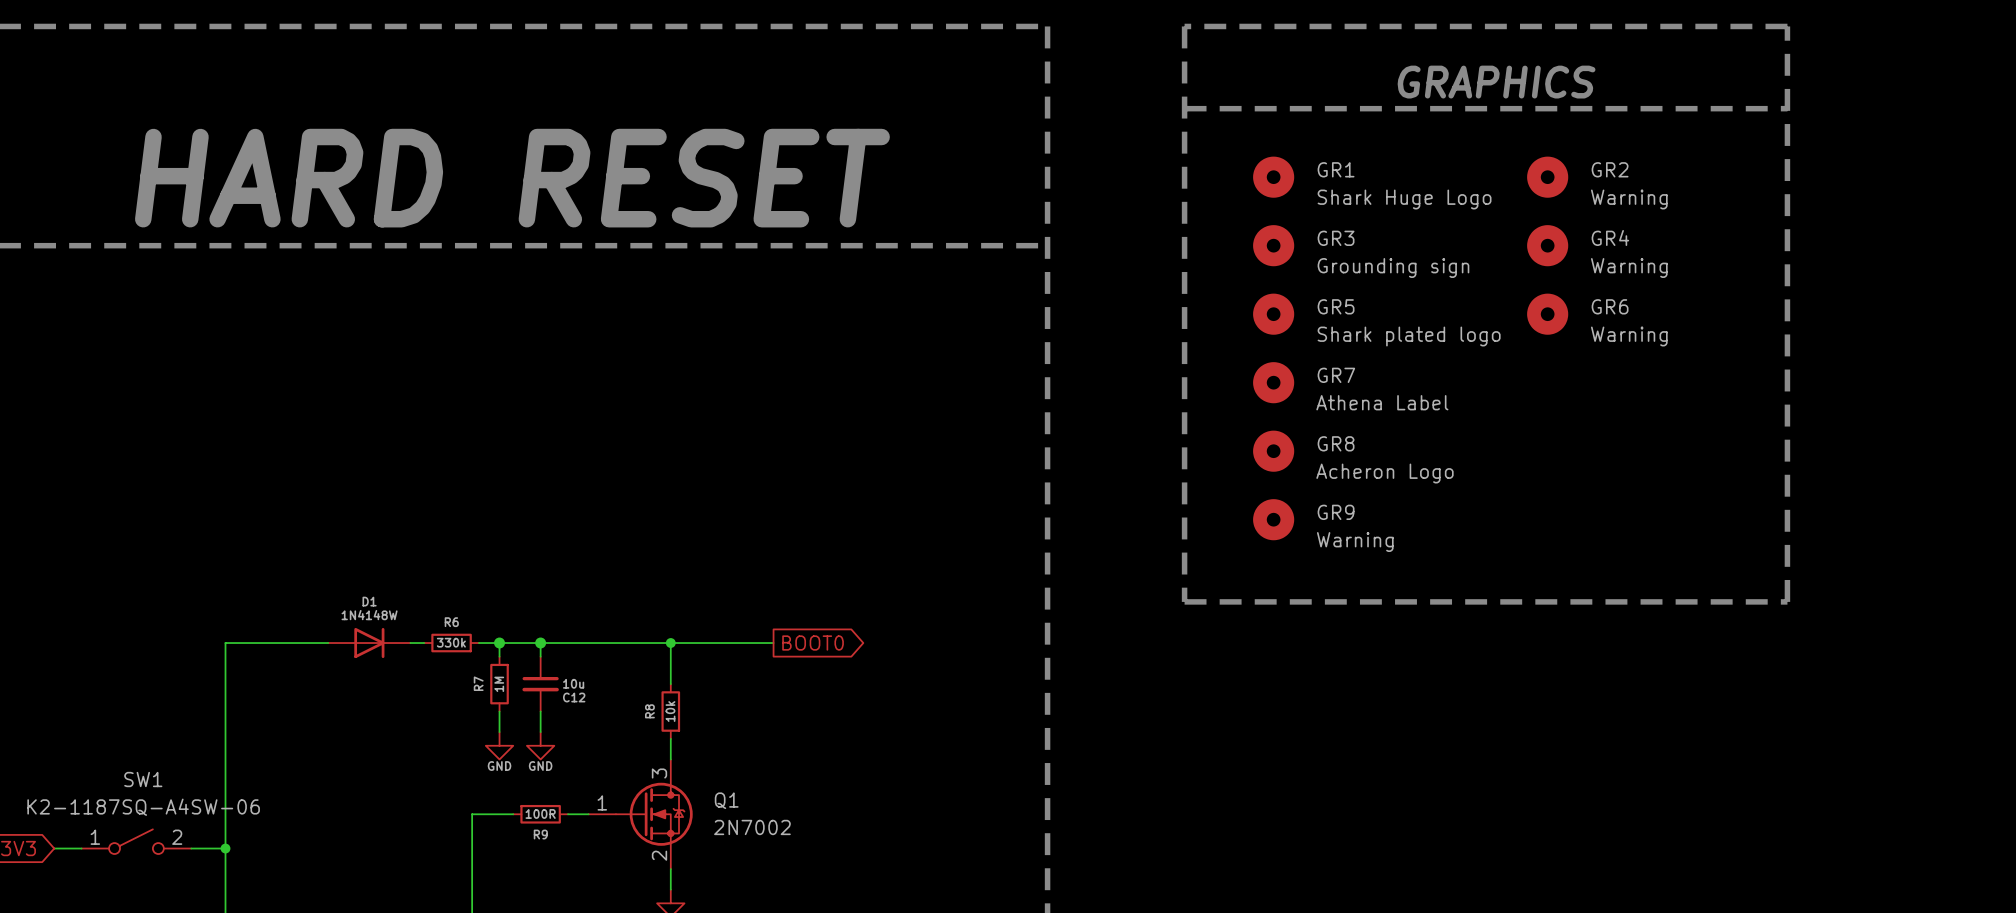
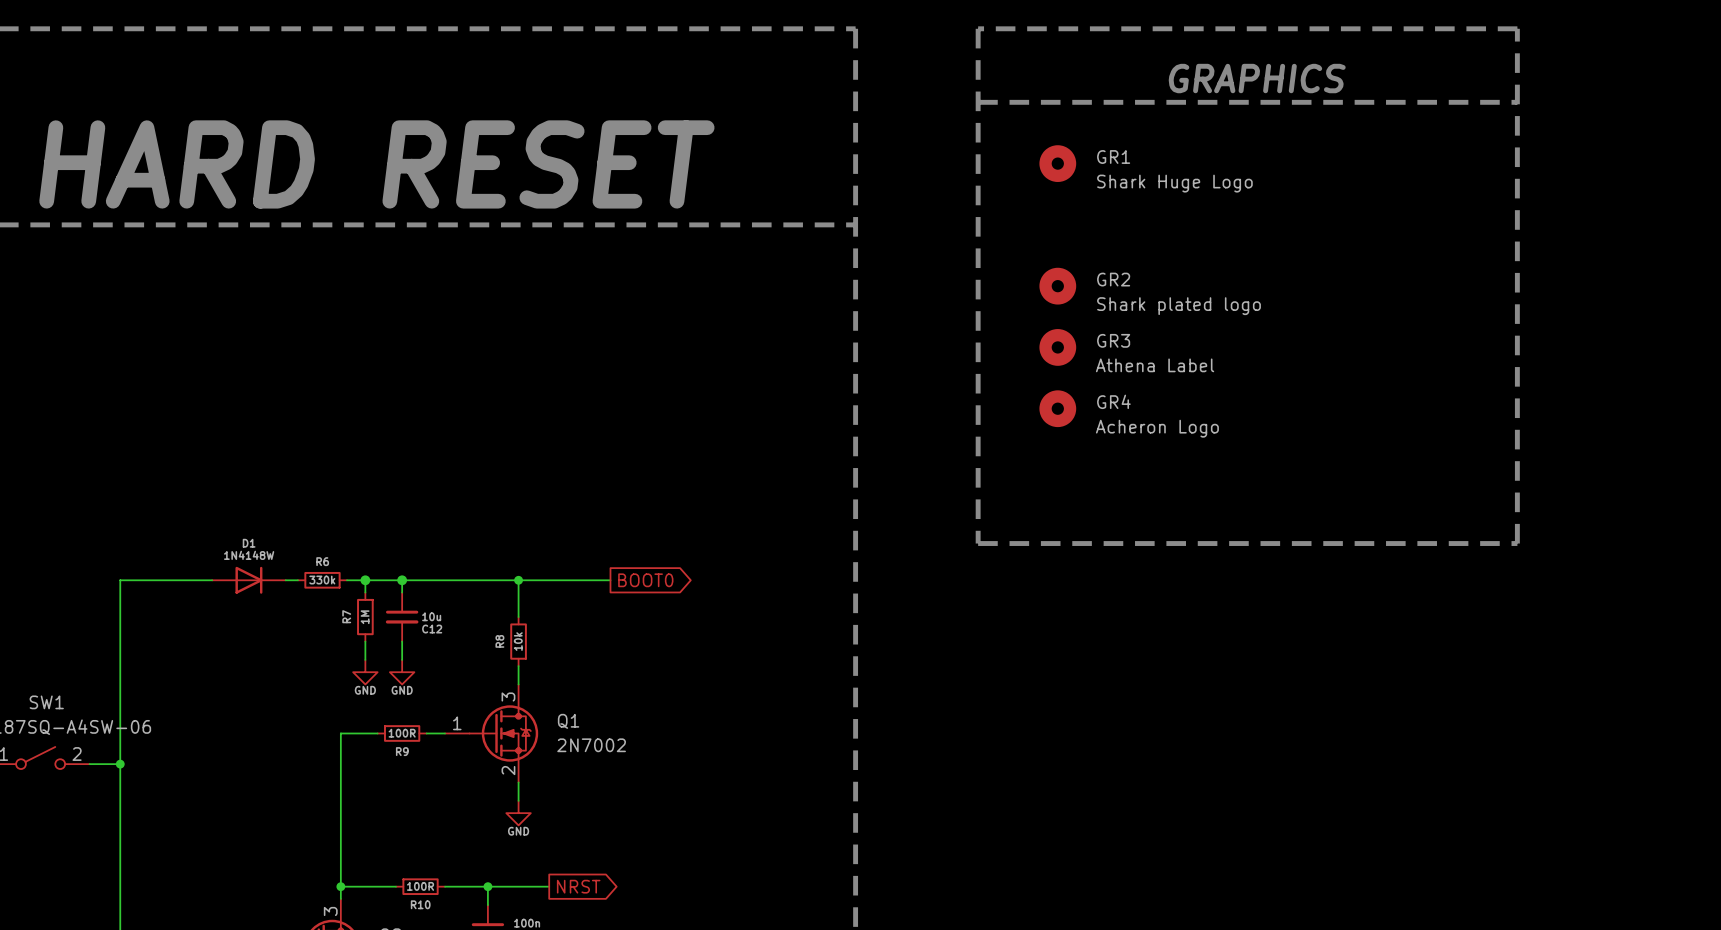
GR2: Warning (1547, 177) -> none
GR3: Grounding sign (1273, 245) -> none
GR4: Warning (1547, 245) -> none
GR5 name: GR5 (1336, 306) -> GR2 (1113, 279)
GR6: Warning (1547, 314) -> none
GR7 name: GR7 (1336, 375) -> GR3 (1113, 340)
GR8 name: GR8 (1336, 443) -> GR4 (1113, 401)
GR9: Warning (1273, 519) -> none

